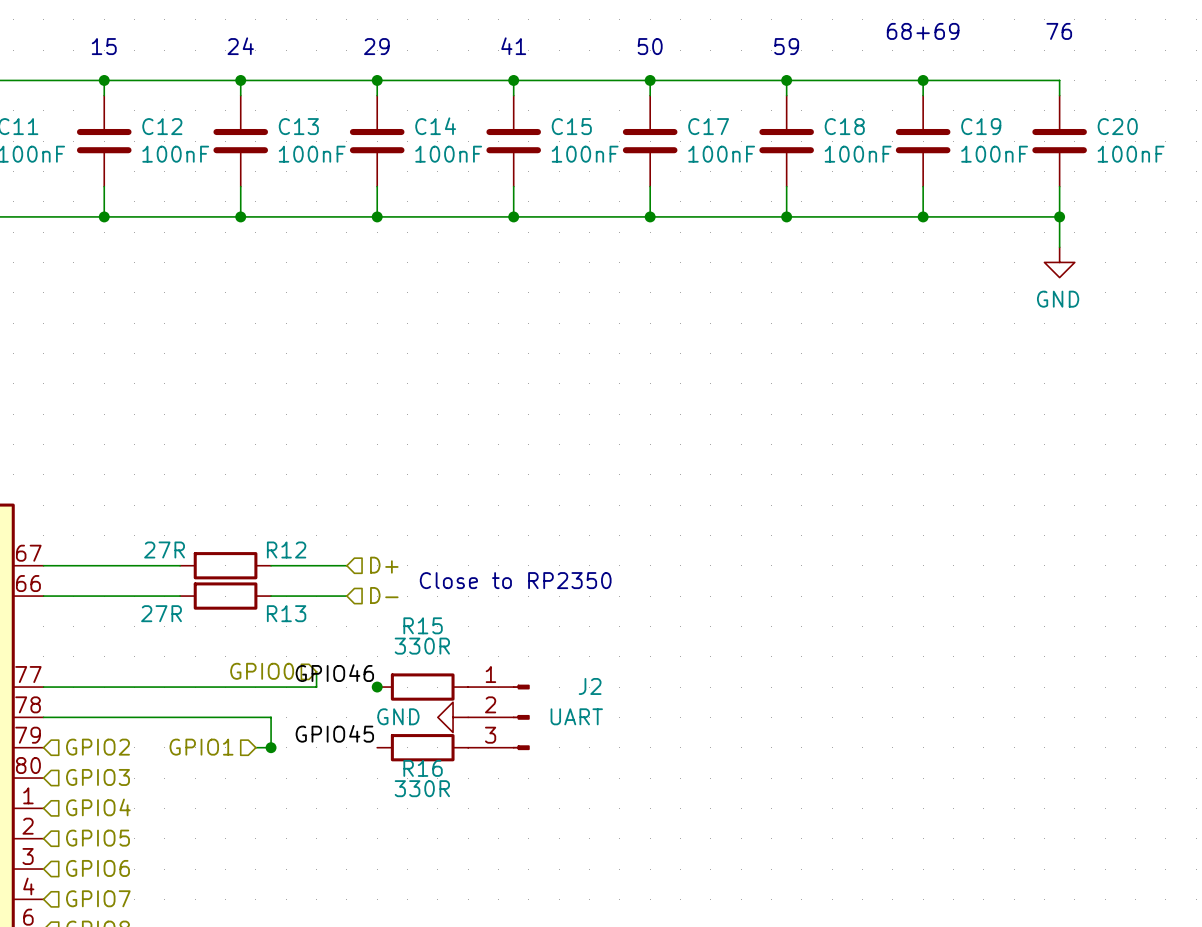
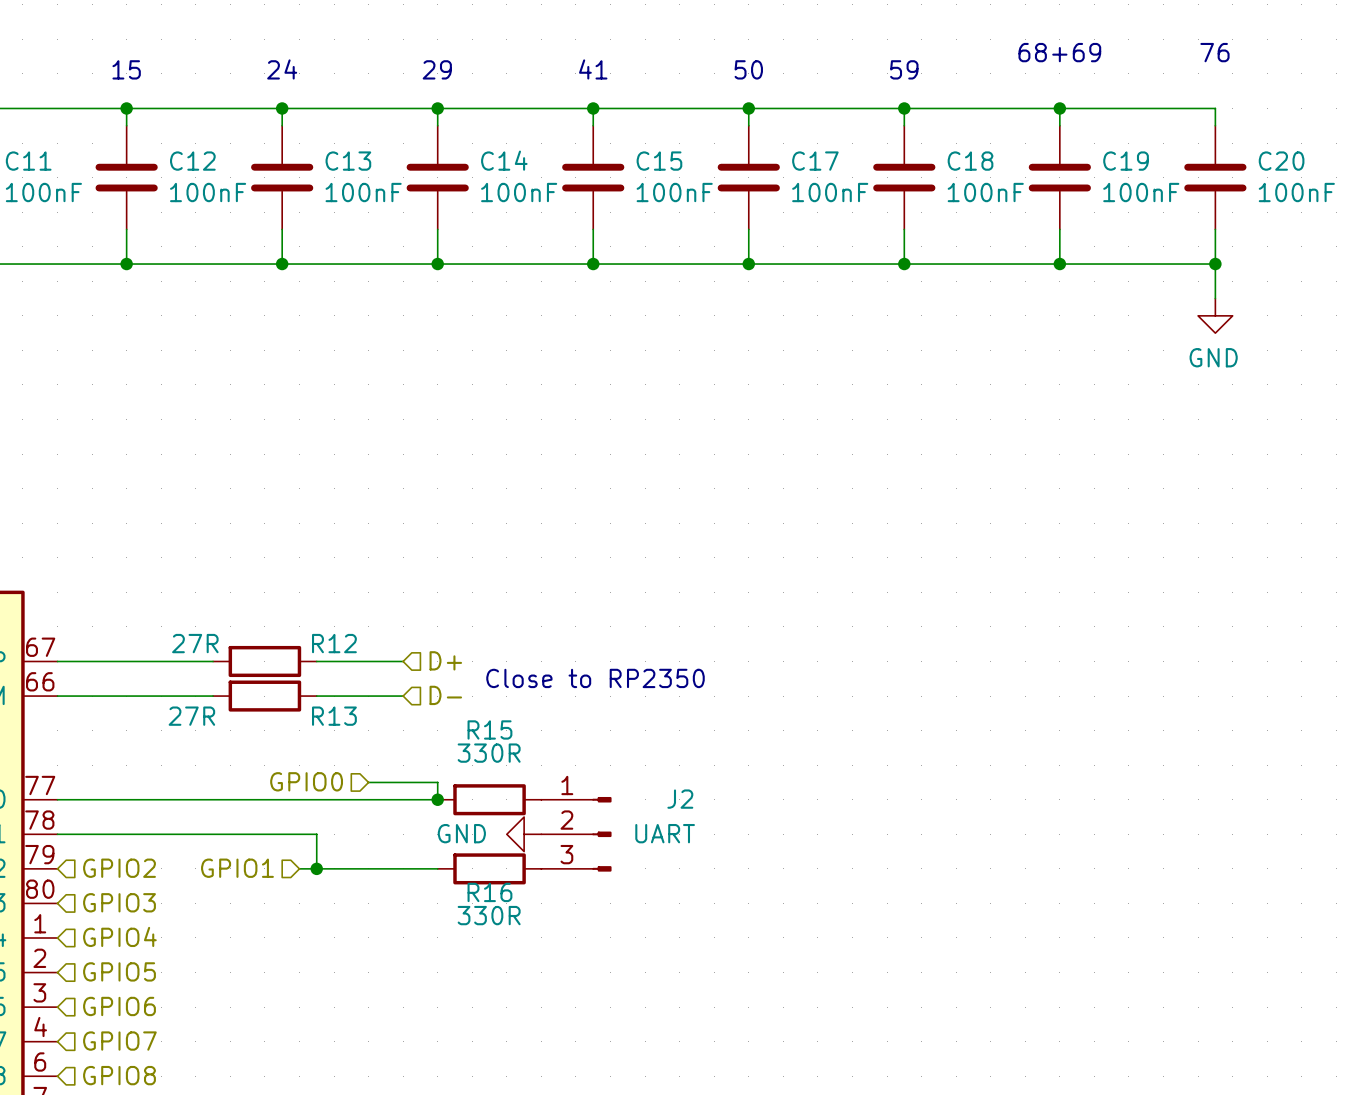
wire: (316, 671) (316, 687) -> (368, 782) (437, 782) (437, 799) (368, 799)
label: GPIO46 (334, 673) -> none
label: GPIO45 (334, 733) -> none
wire: none -> (316, 868) (437, 868)

